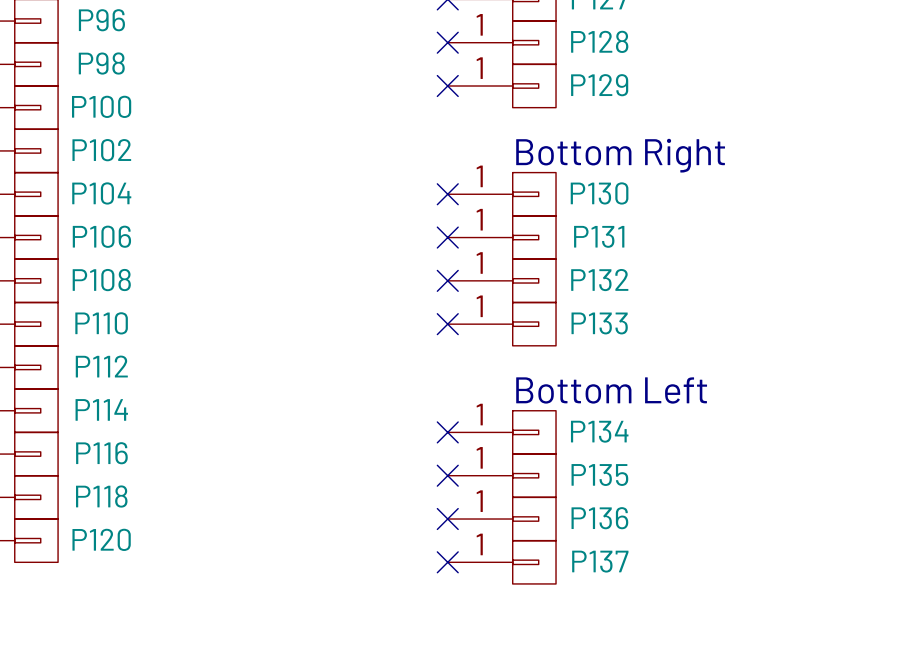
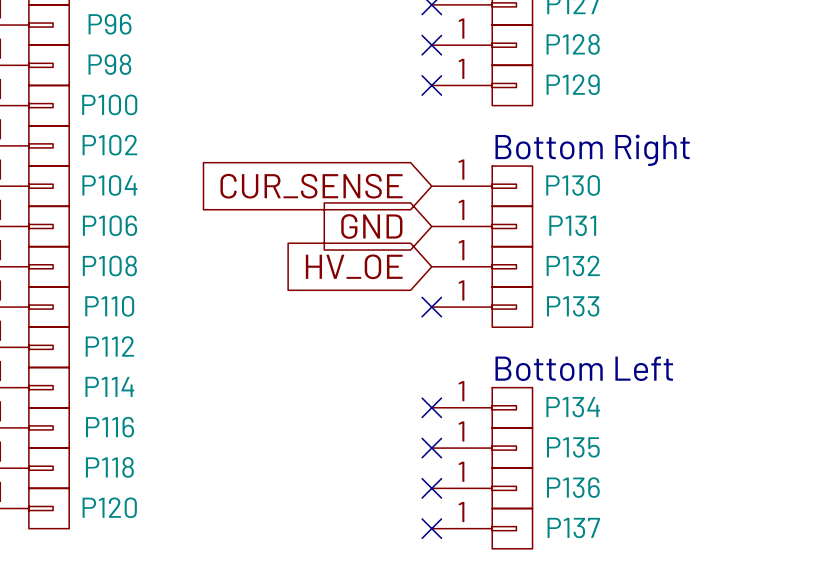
global label: none -> CUR_SENSE (311, 186)
no-connect mark: (447, 194) -> none
global label: none -> GND (371, 226)
no-connect mark: (447, 237) -> none
global label: none -> HV_OE (354, 266)
no-connect mark: (447, 280) -> none

